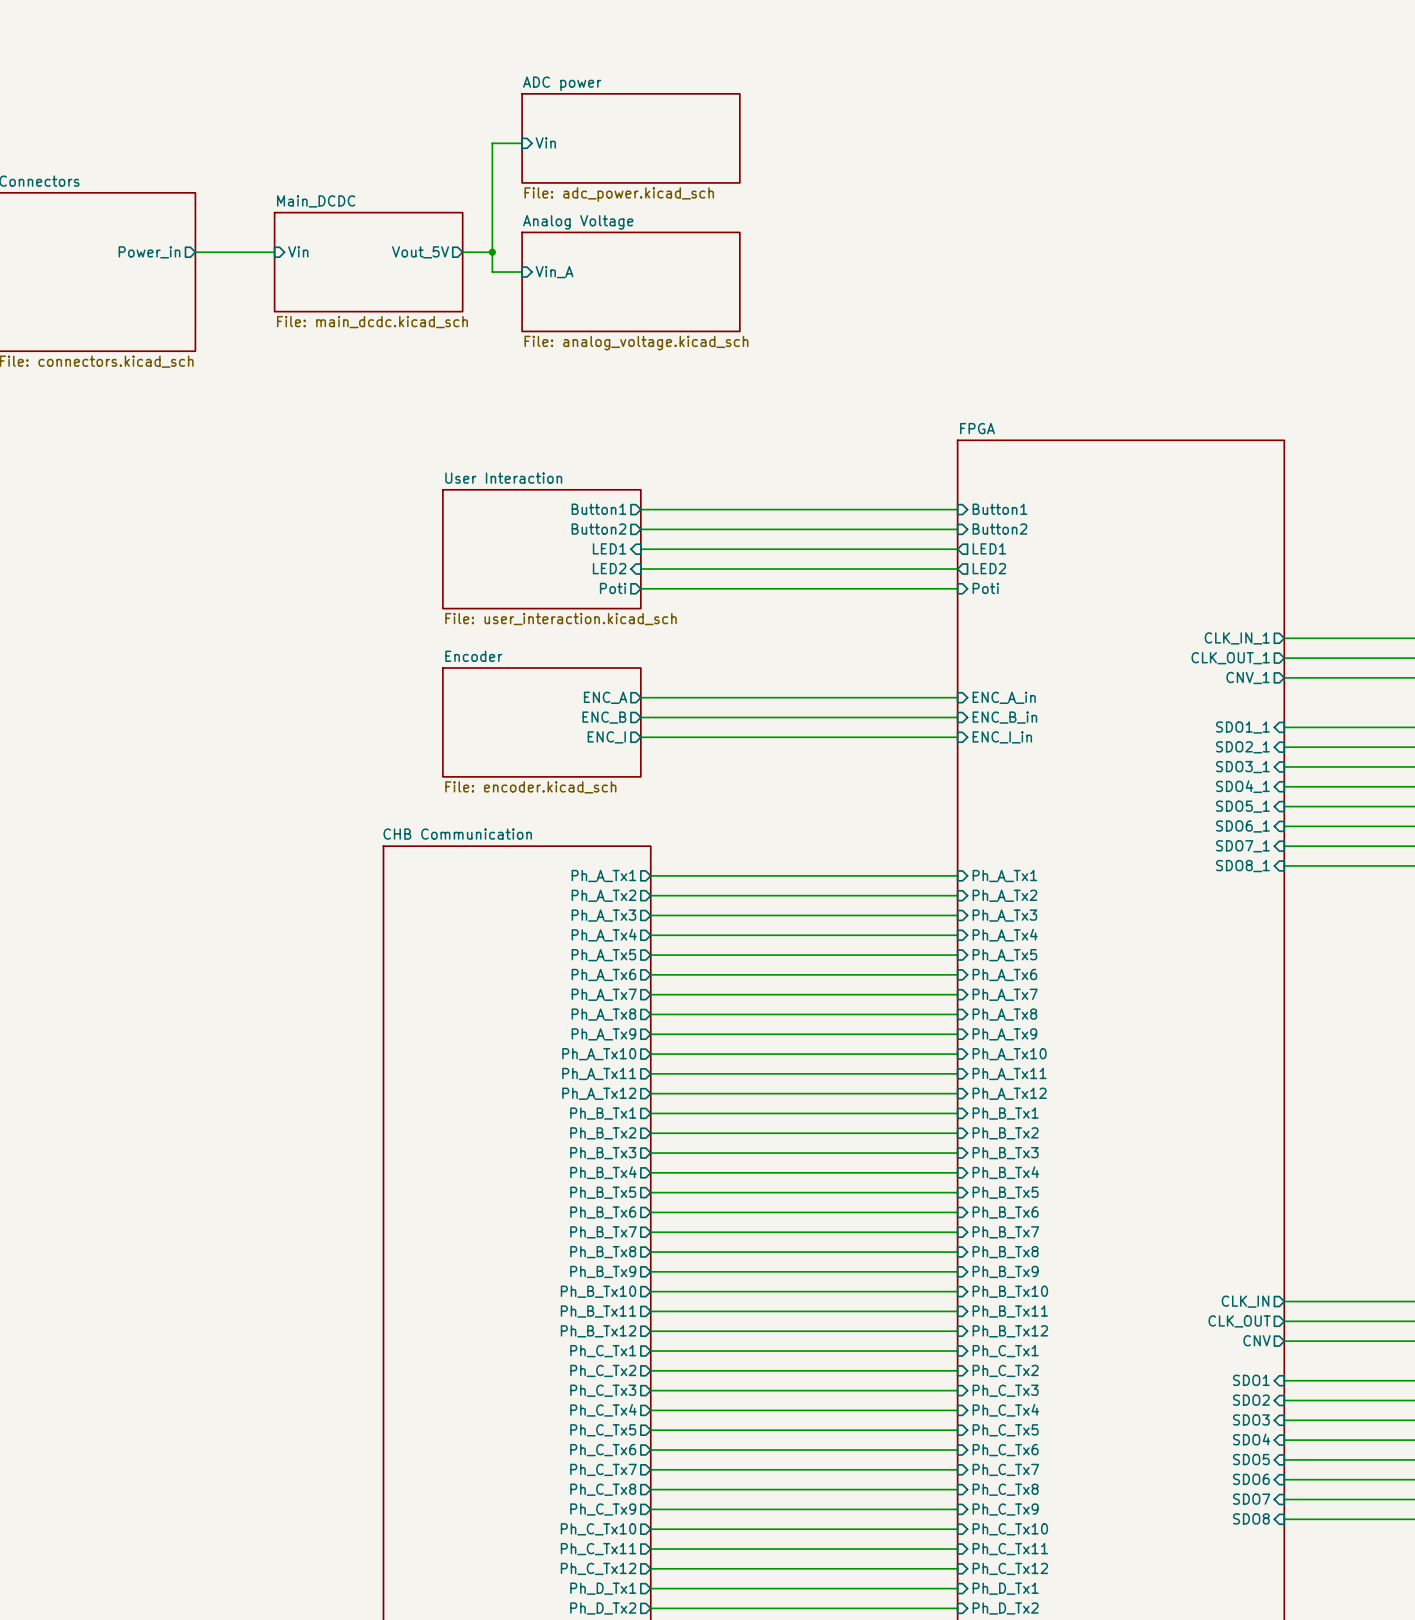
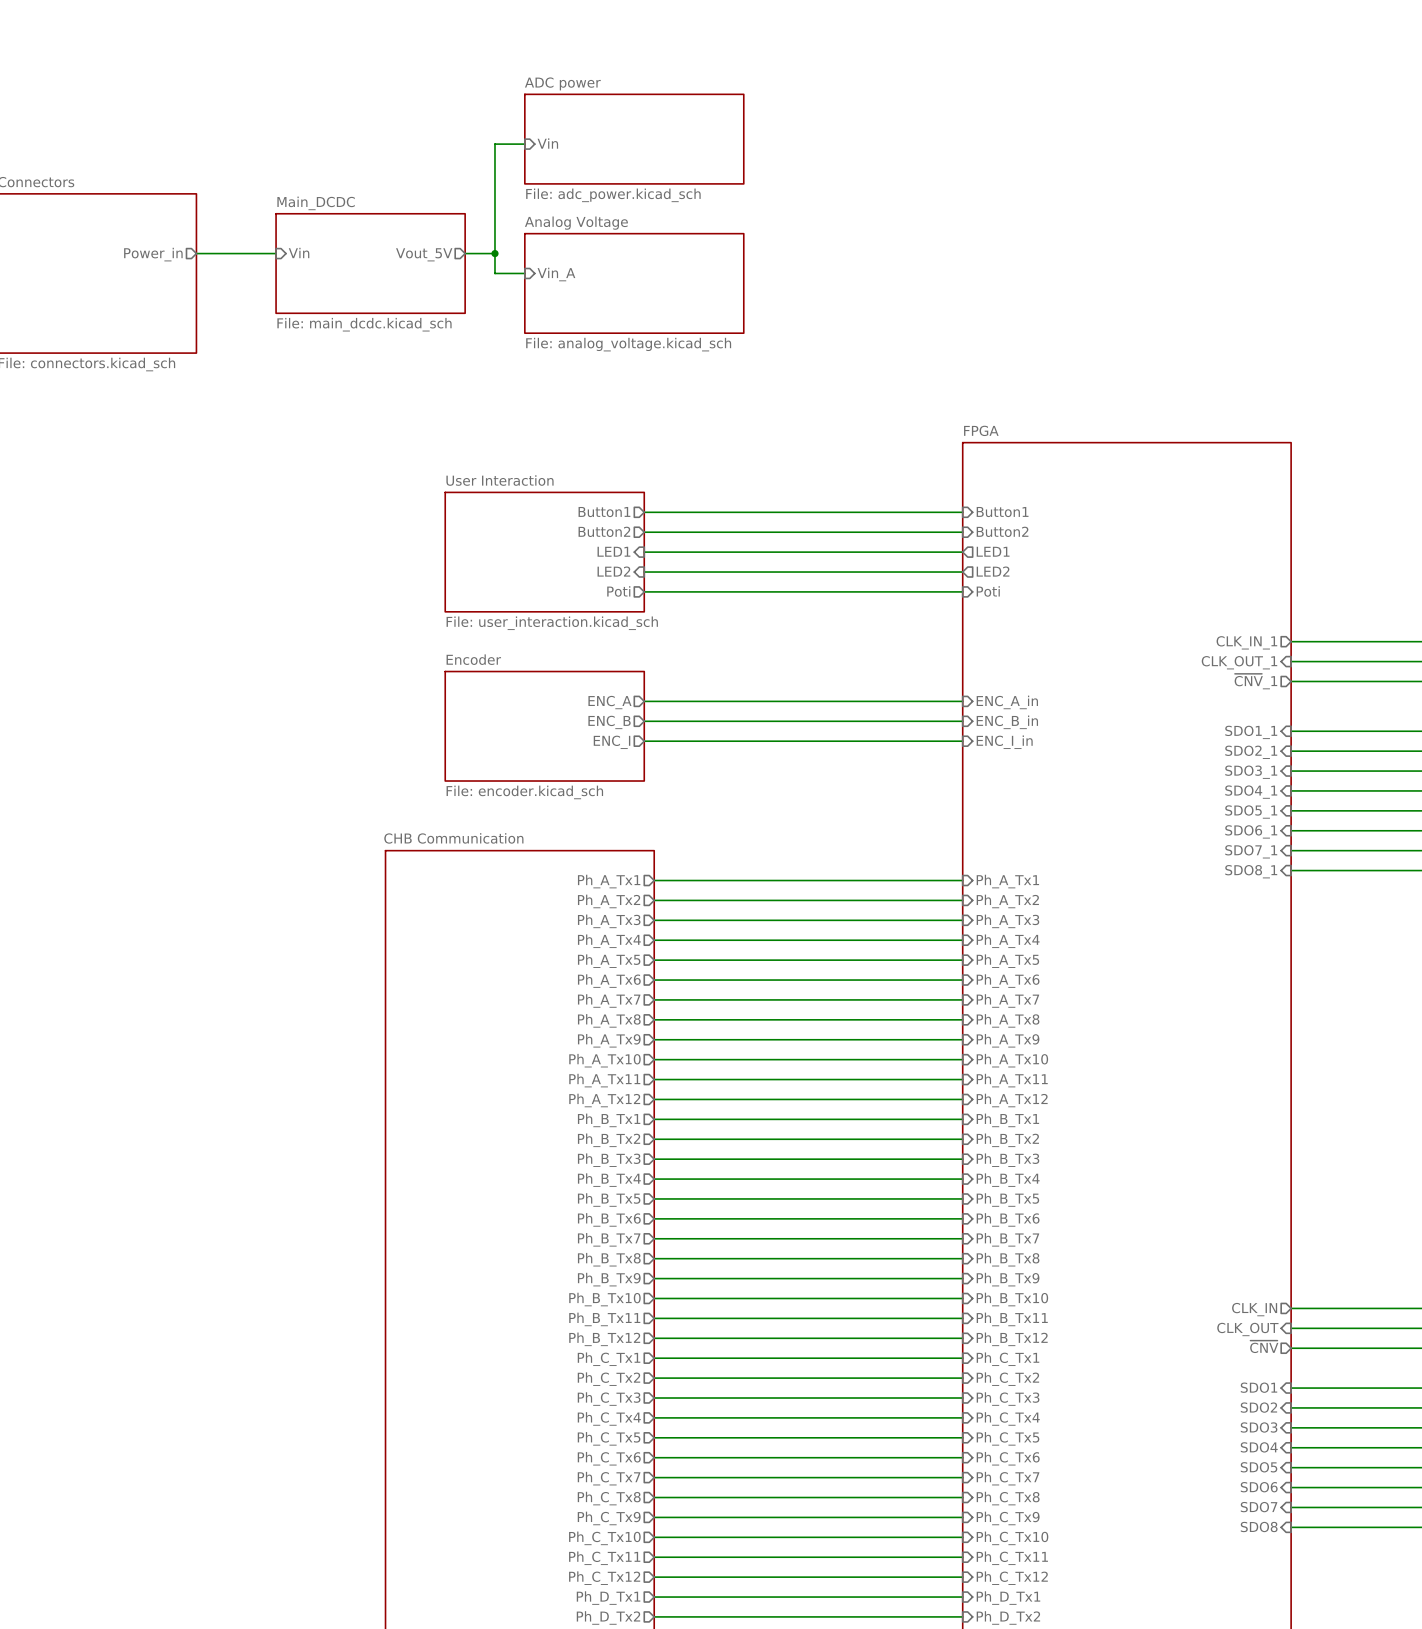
sheet pin shape: output (1230, 658) -> input (1239, 662)
sheet pin: CNV_1 (1248, 677) -> ~{CNV}_1 (1255, 681)
sheet pin shape: output (1239, 1321) -> input (1247, 1329)
sheet pin: CNV (1257, 1340) -> ~{CNV} (1264, 1346)

